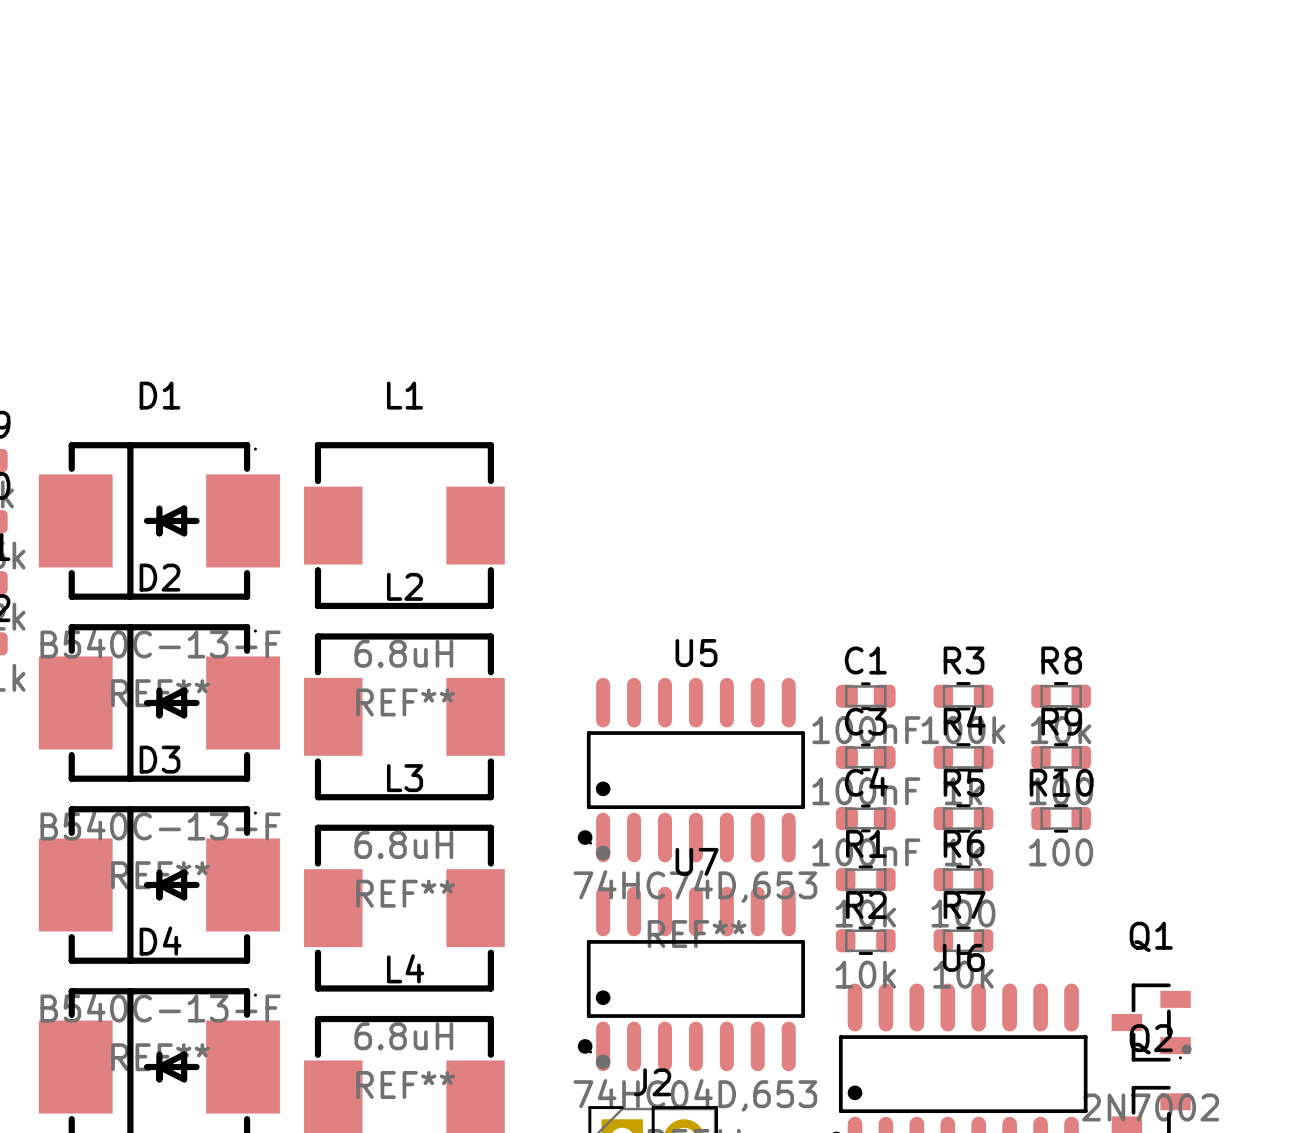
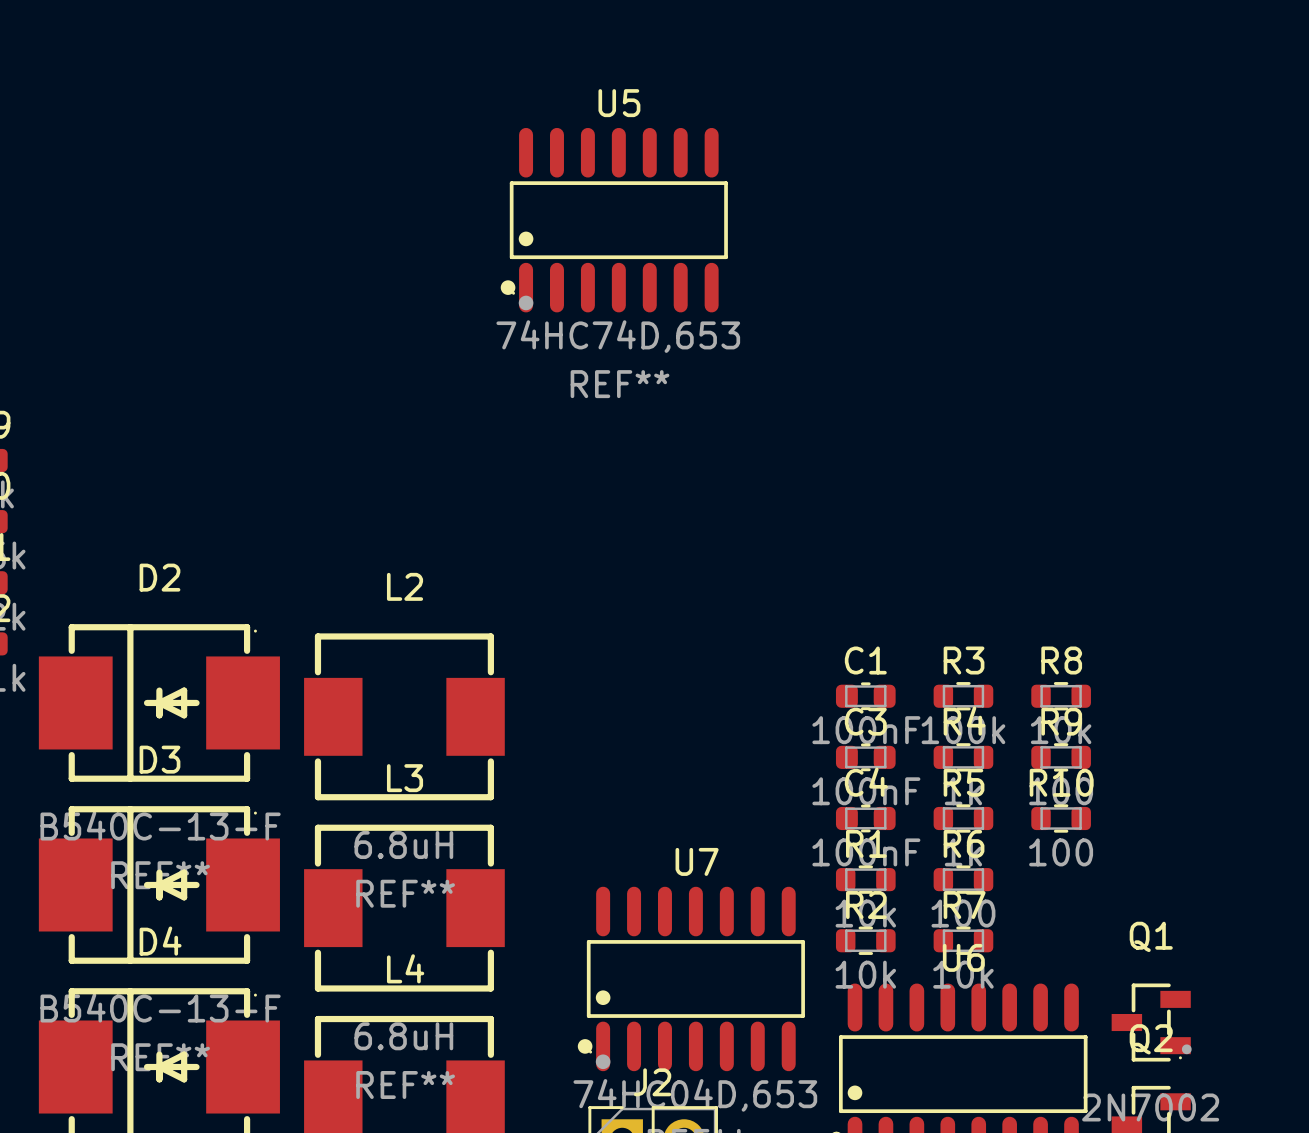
D1: B540C-13-F (159, 520) -> none
L1: 6.8uH (404, 525) -> none
U5 position: (691, 770) -> (614, 220)

